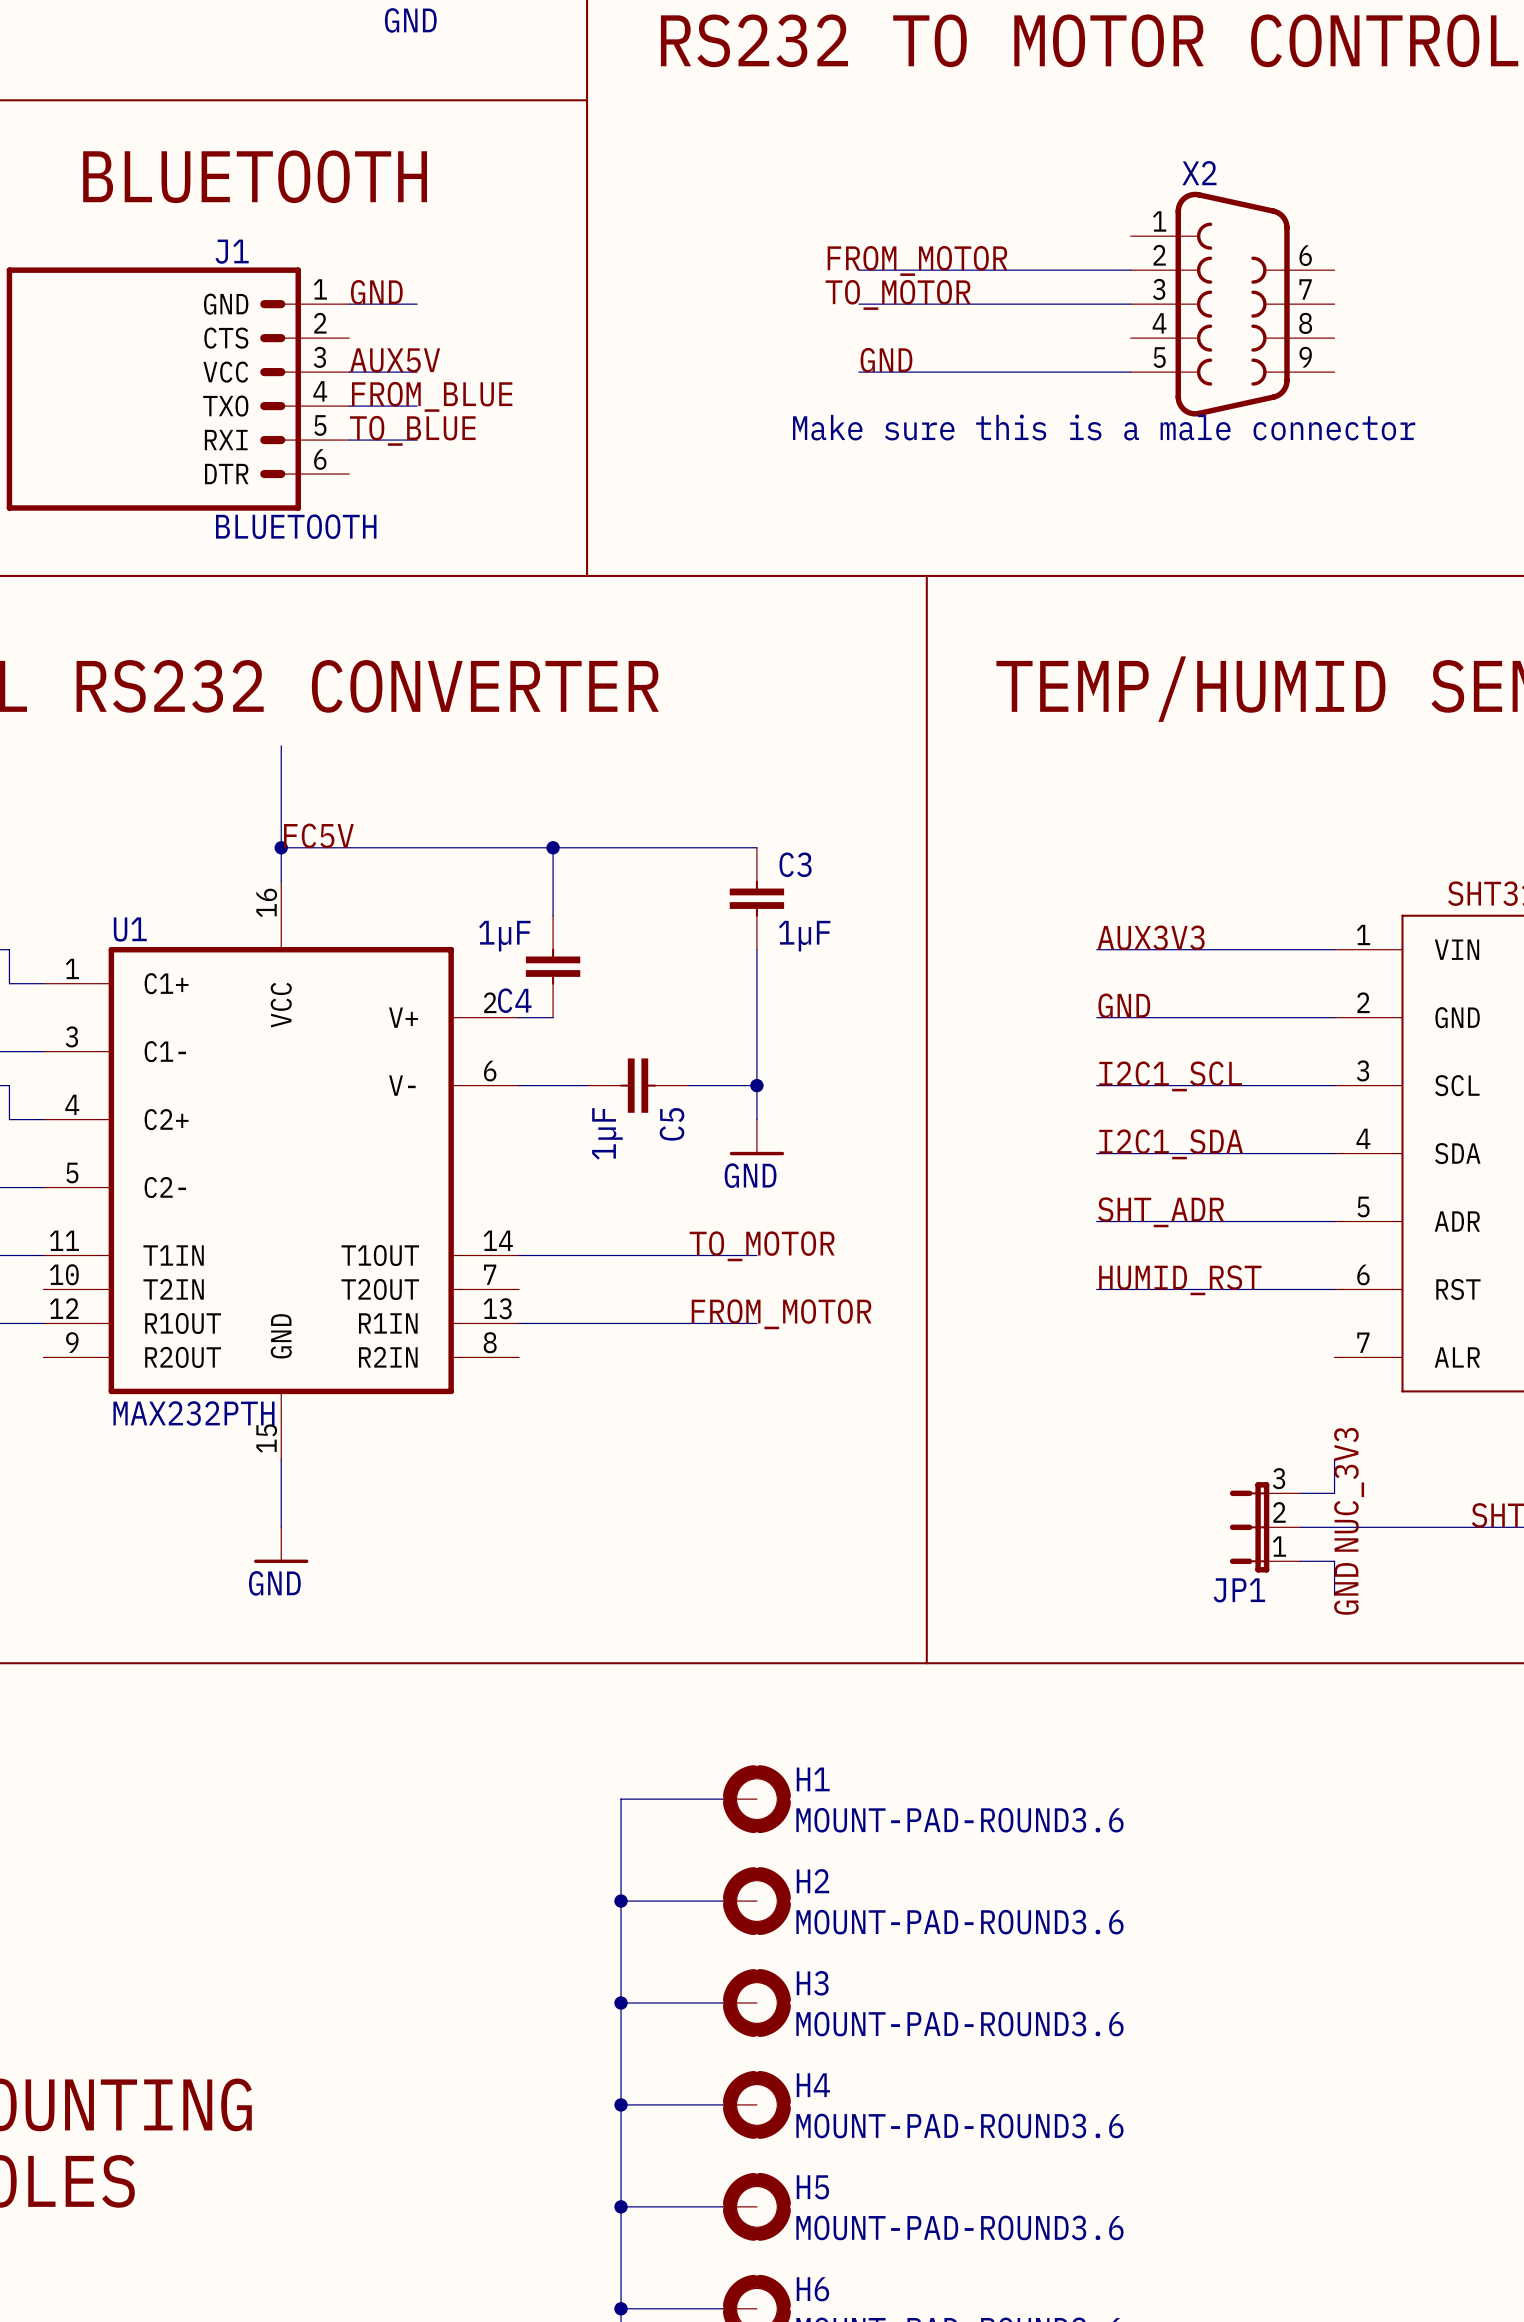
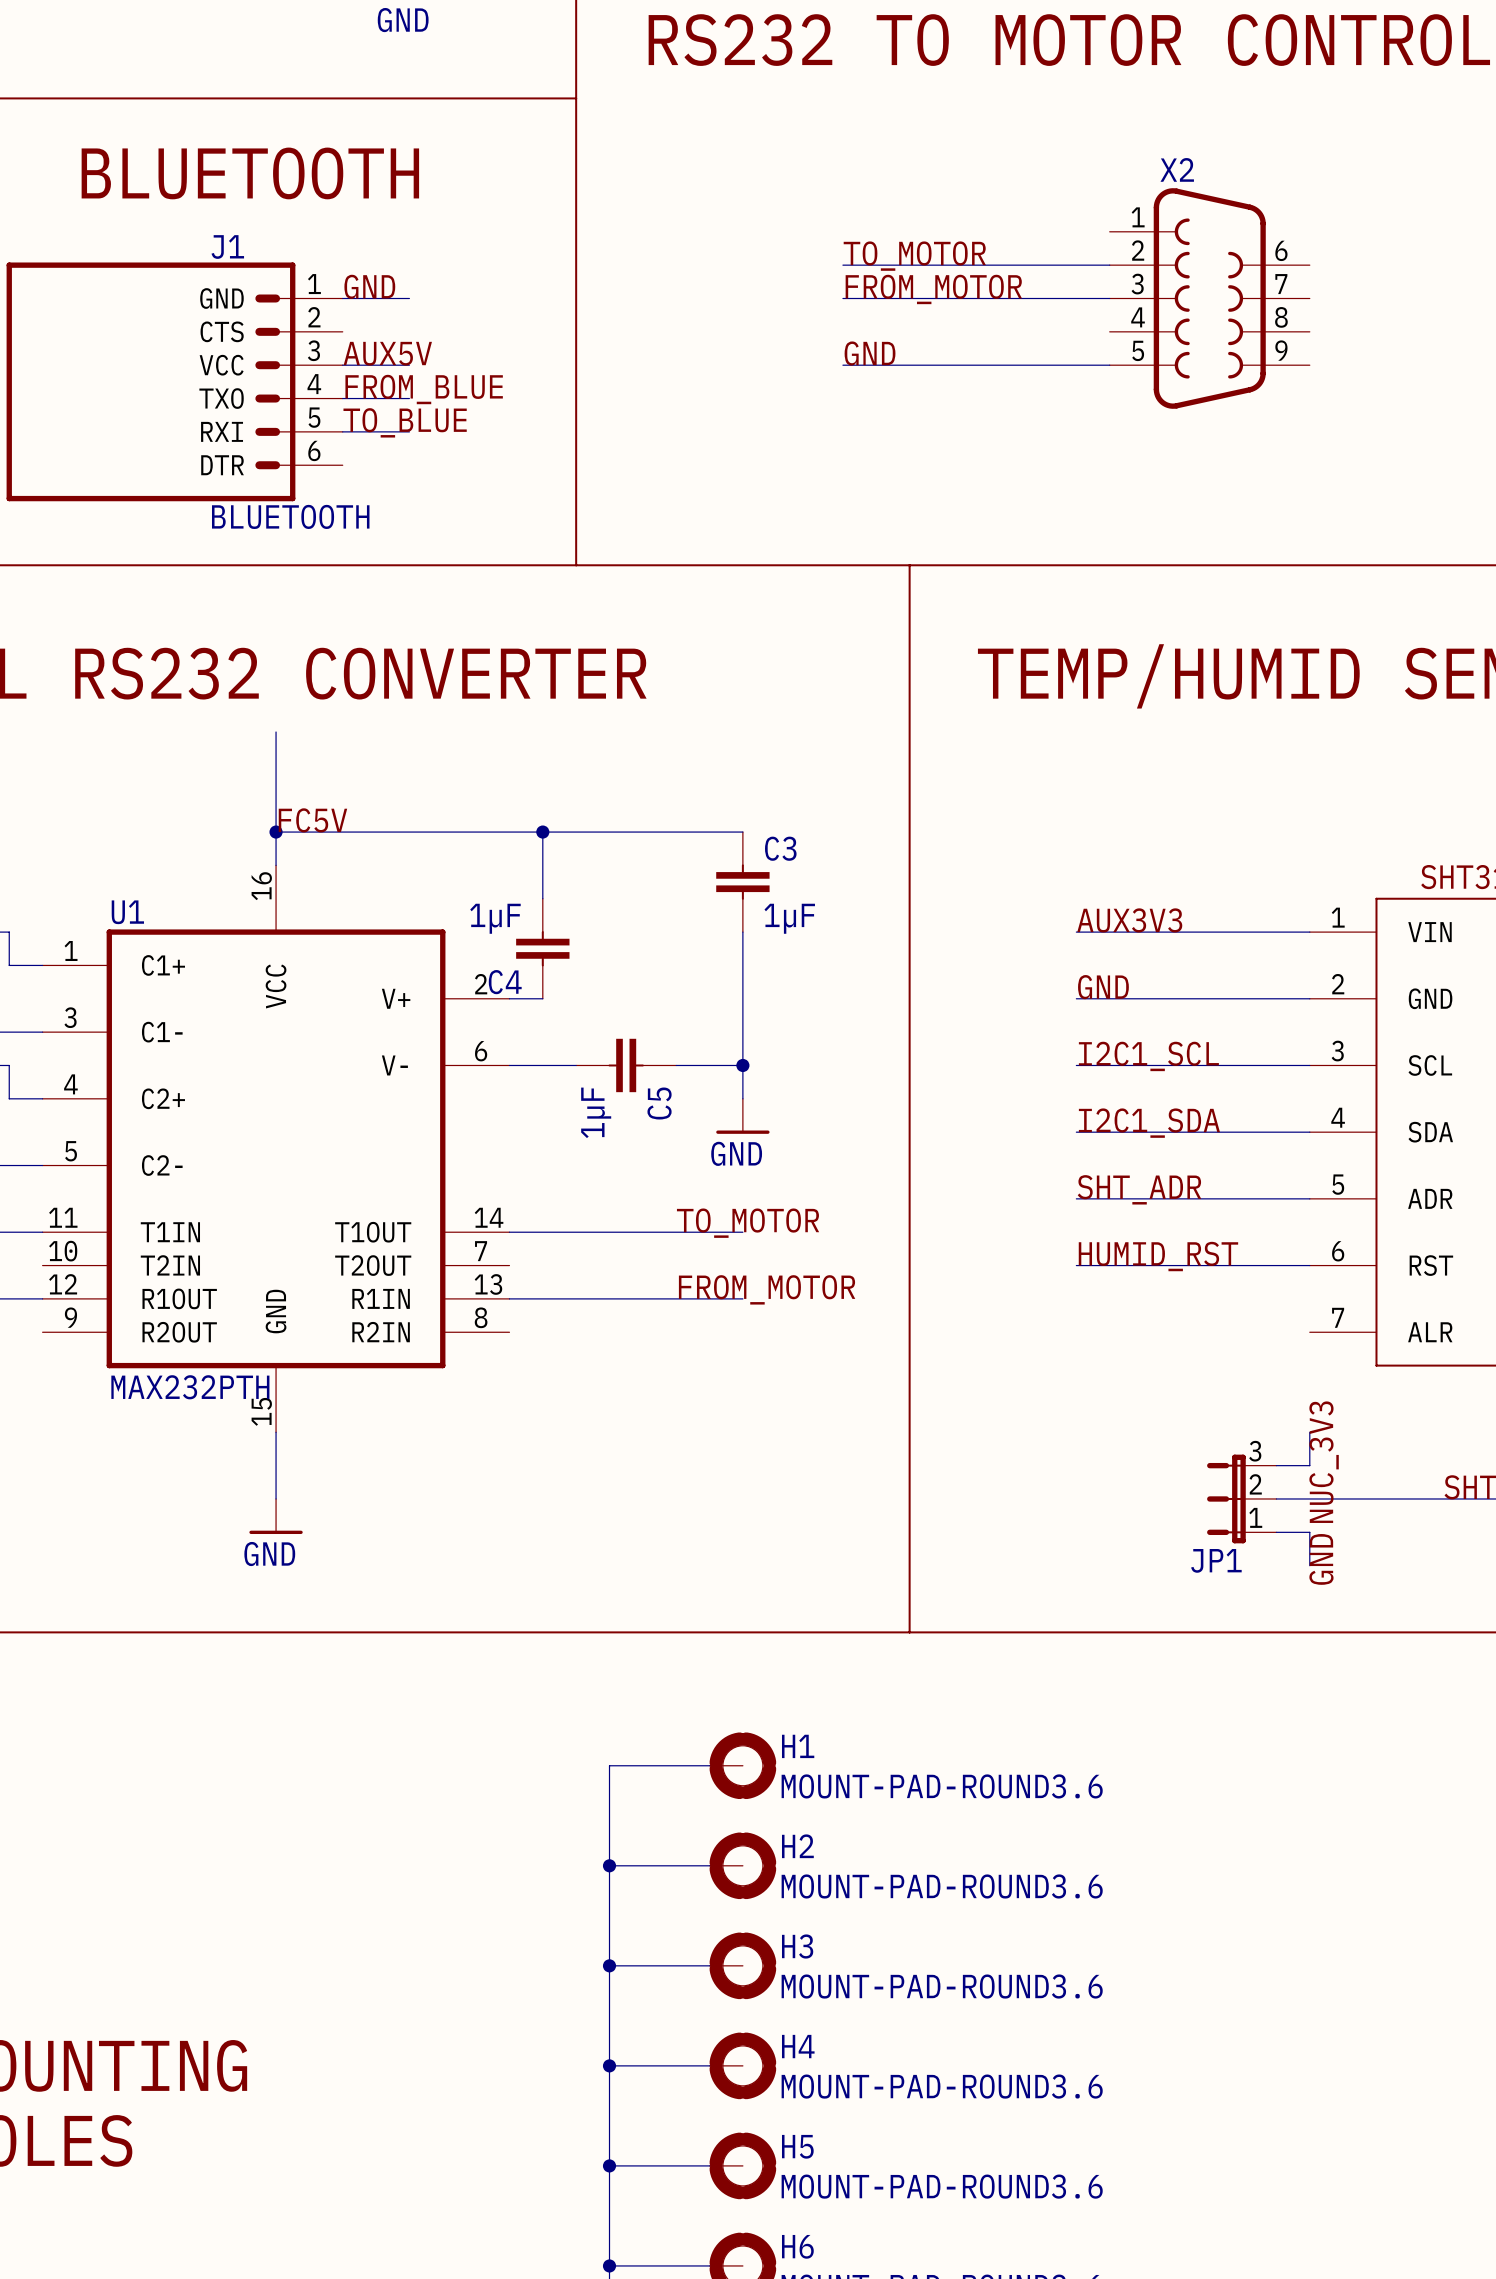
label position: FROM_MOTOR (917, 260) -> FROM_MOTOR (933, 289)
label position: TO_MOTOR (898, 294) -> TO_MOTOR (914, 256)
text: Make sure this is a male connector (1104, 427) -> none

